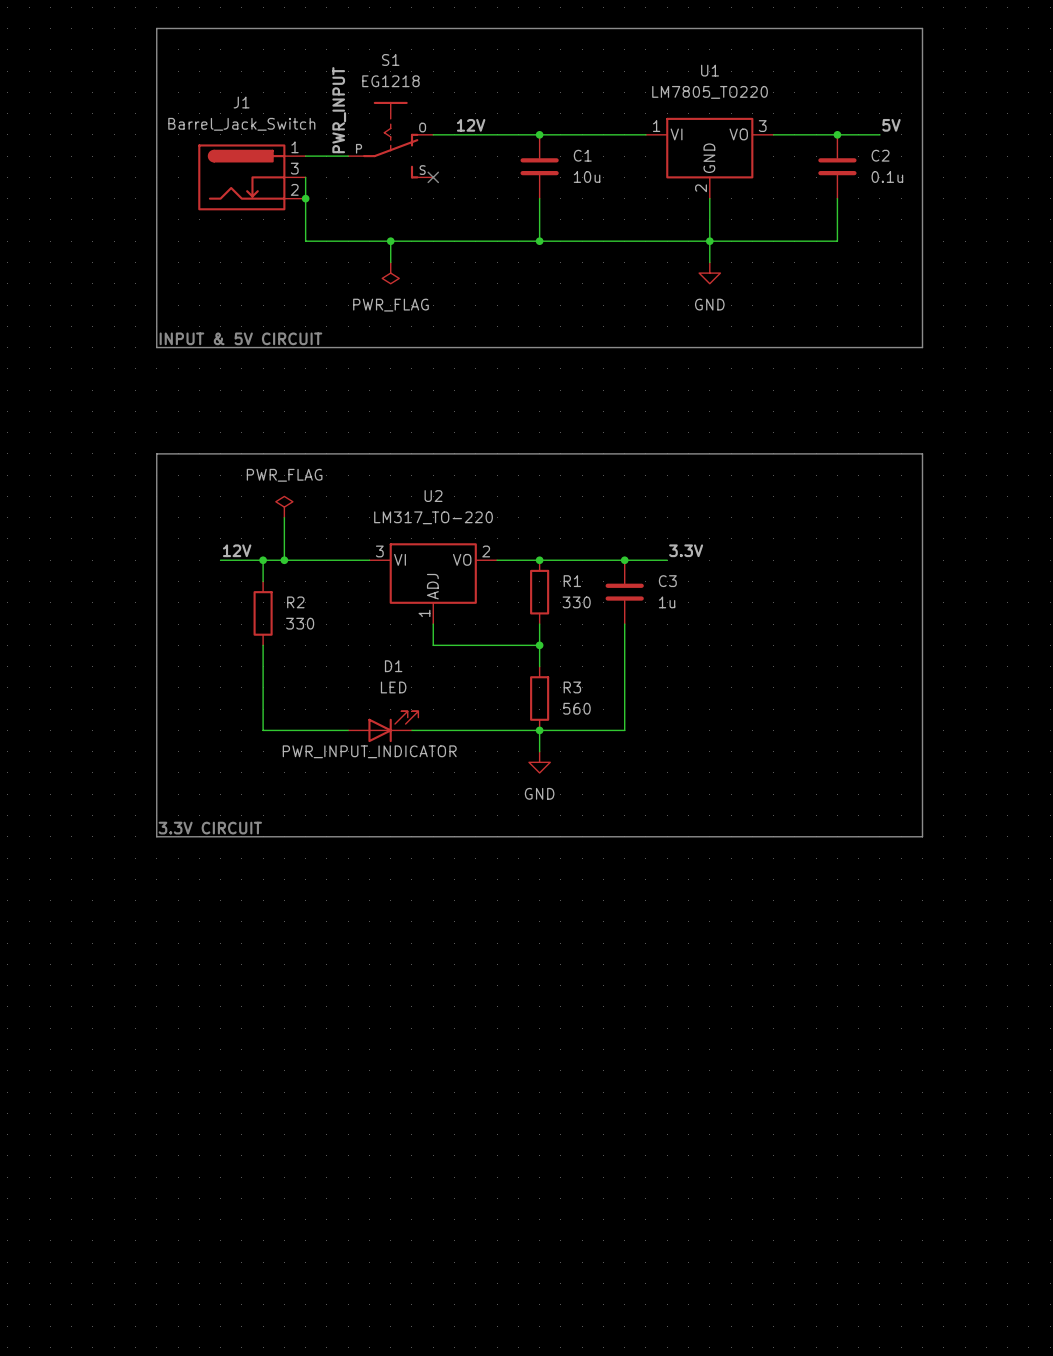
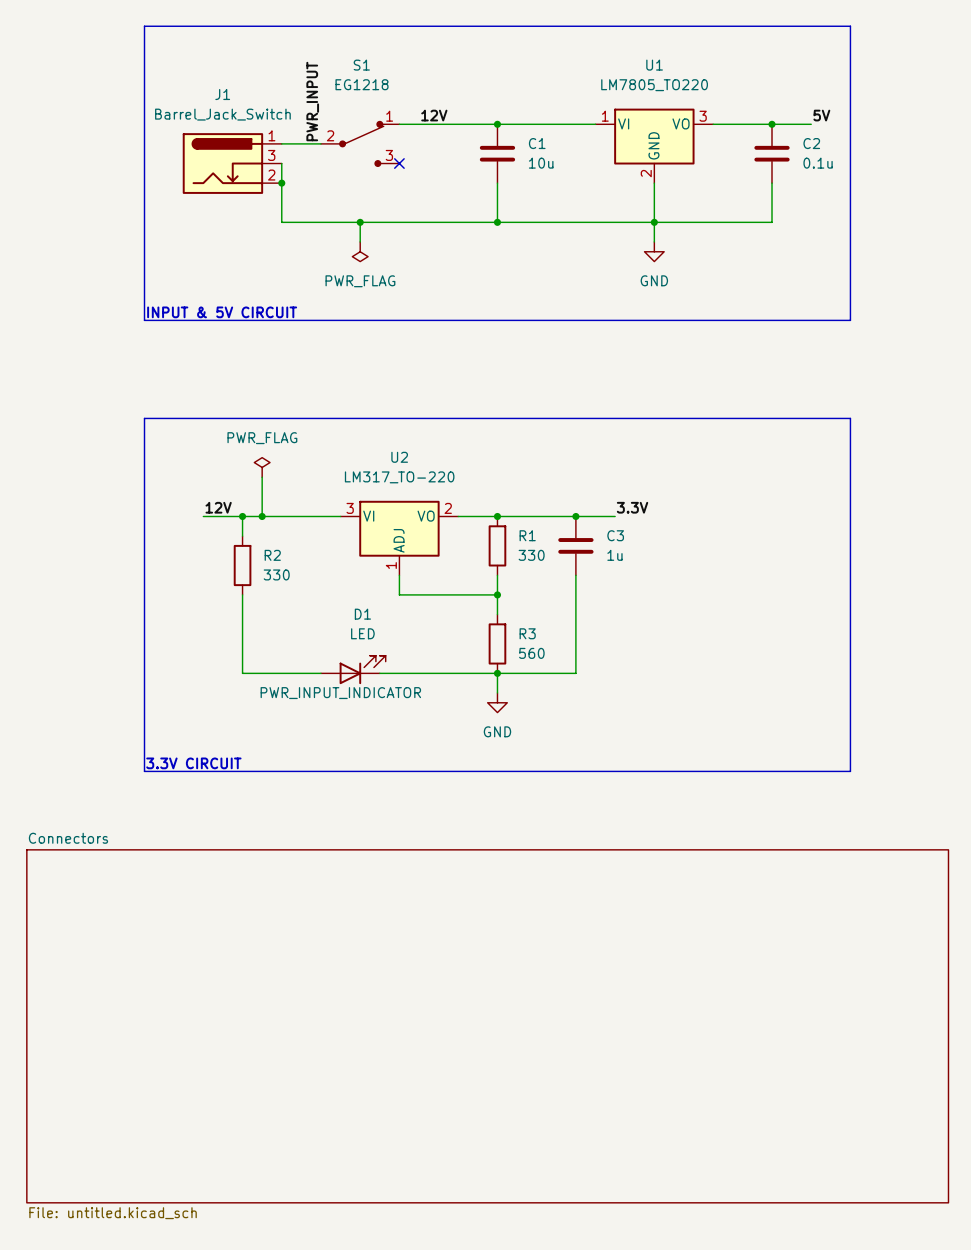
S1 symbol: [348, 101, 434, 179] -> [320, 121, 400, 167]
sheet Connectors: none -> File: untitled.kicad_sch (487, 1026)

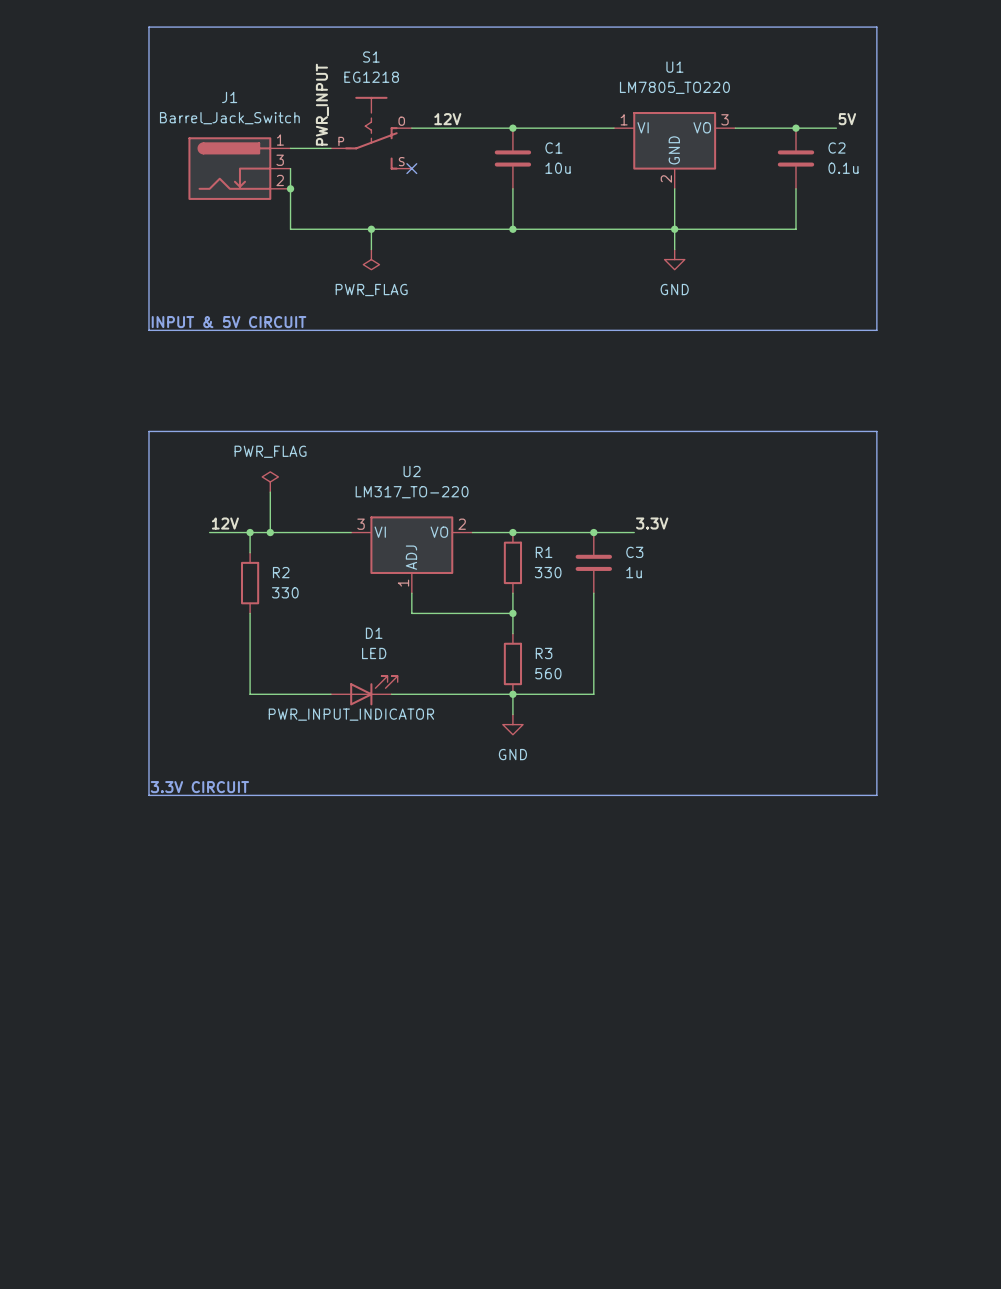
S1 symbol: [320, 121, 400, 167] -> [330, 96, 412, 170]
sheet Connectors: File: untitled.kicad_sch (487, 1026) -> none

